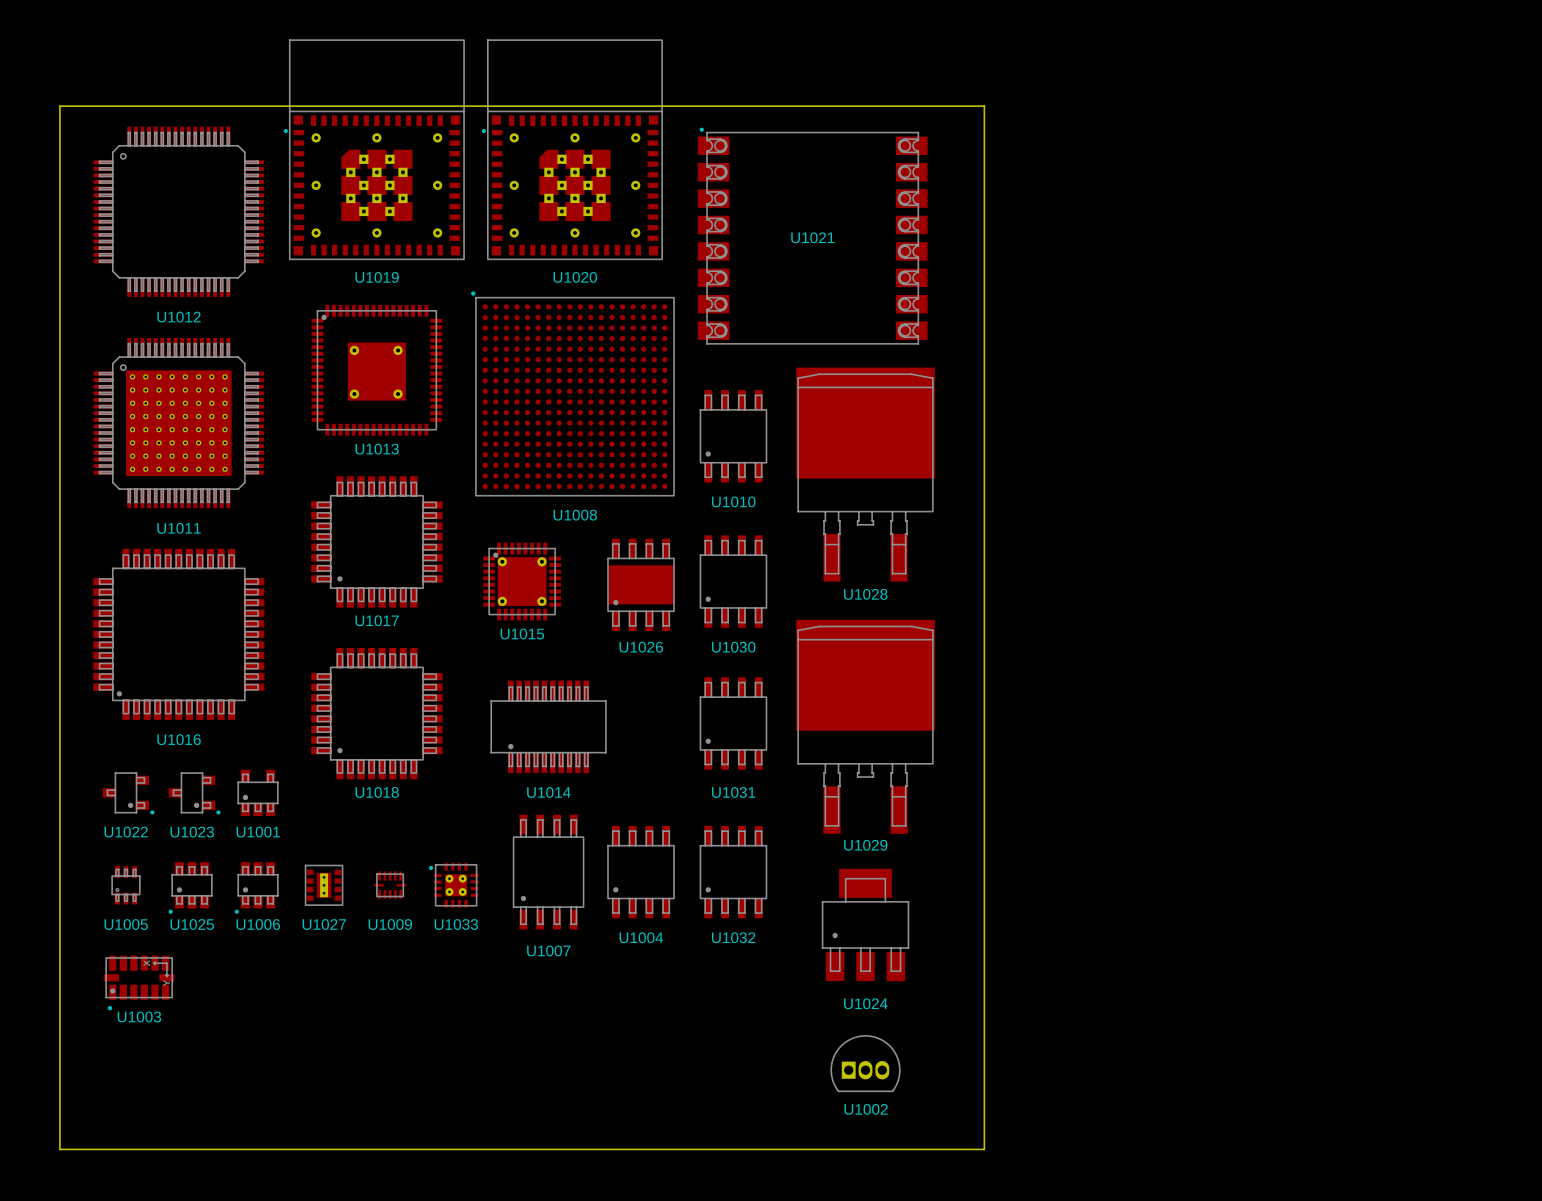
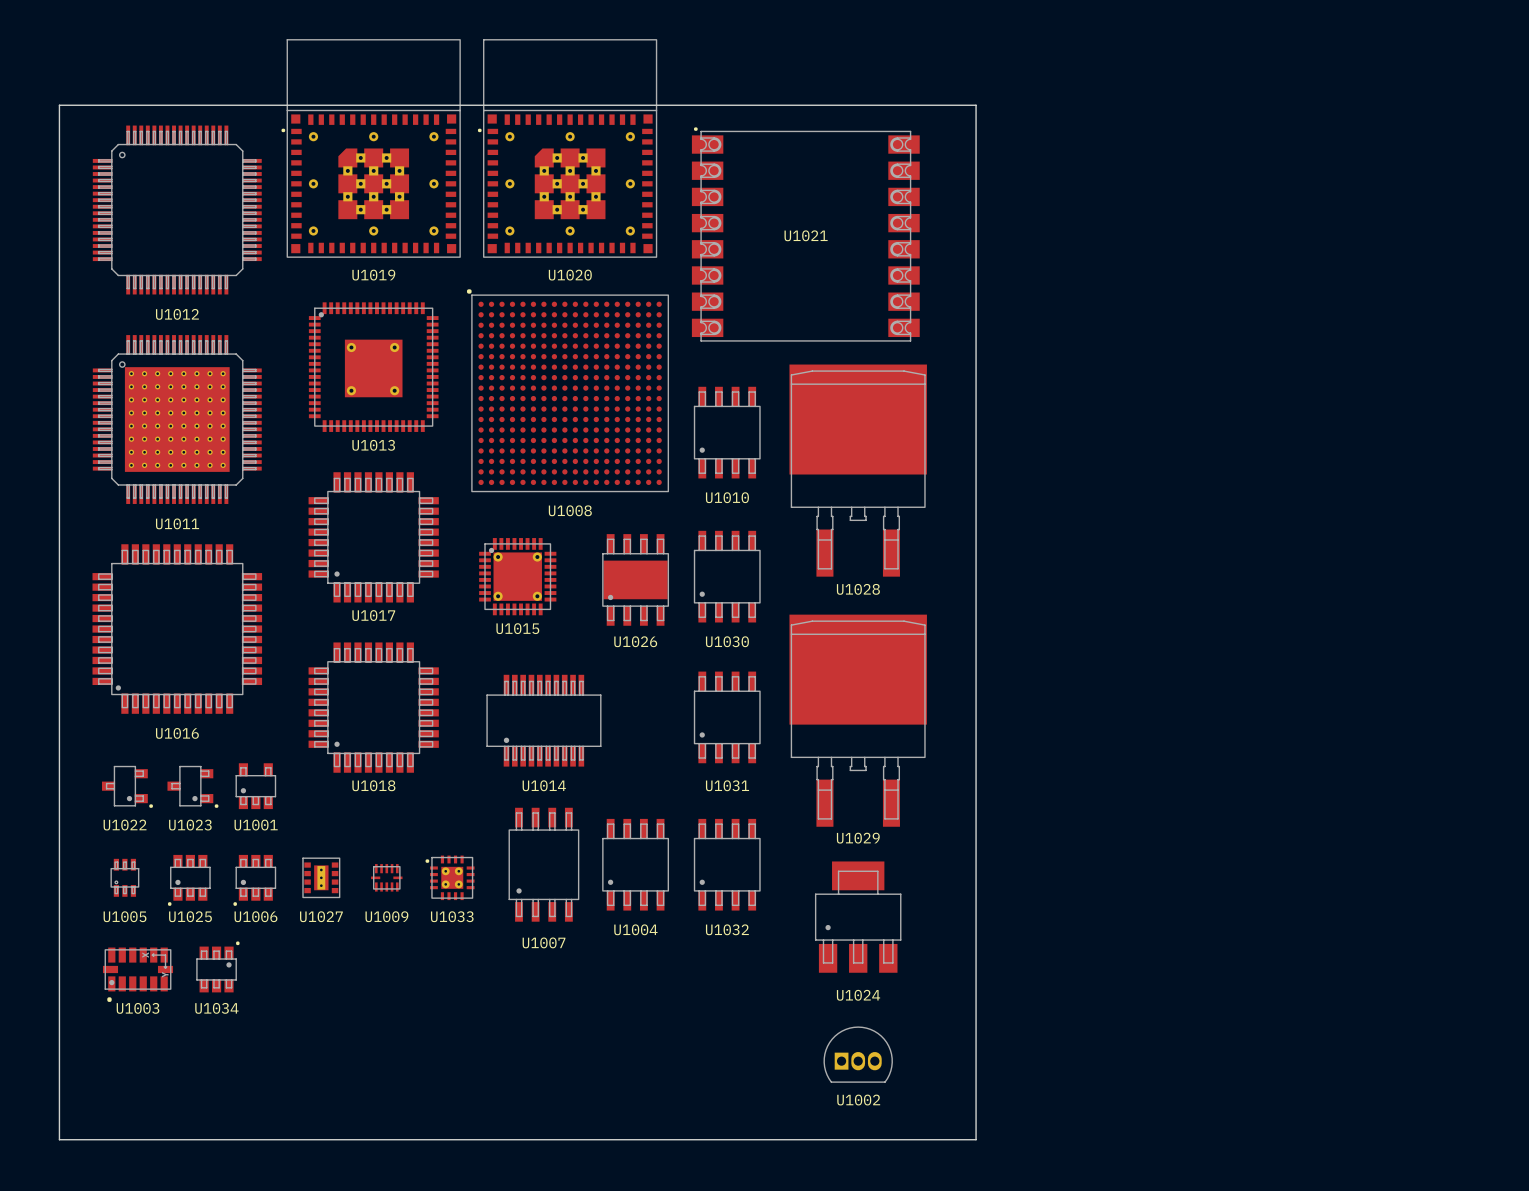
U1034: none -> (216, 969)

